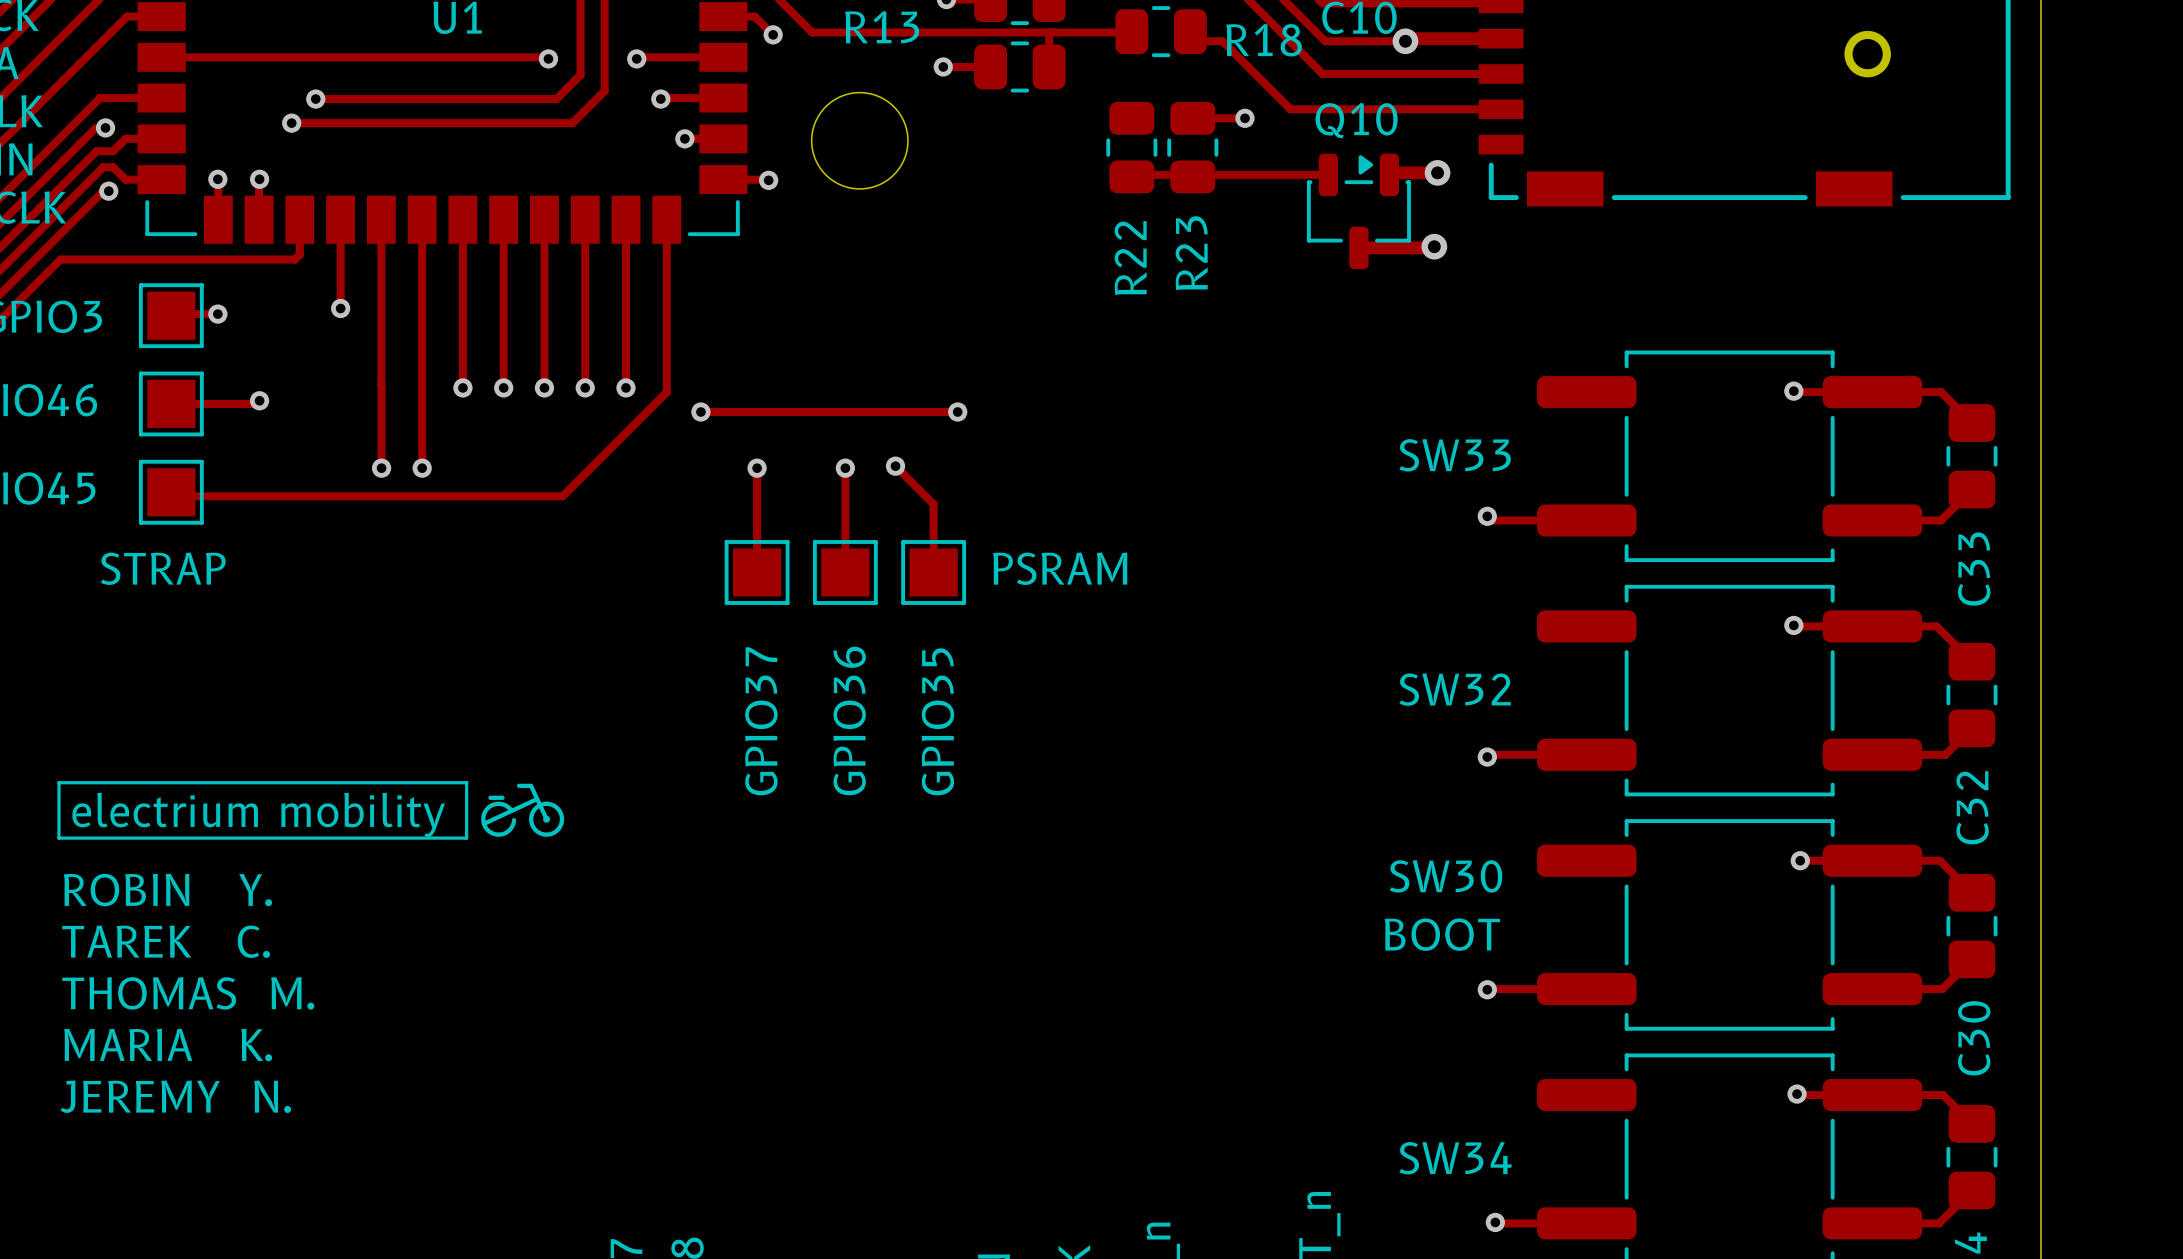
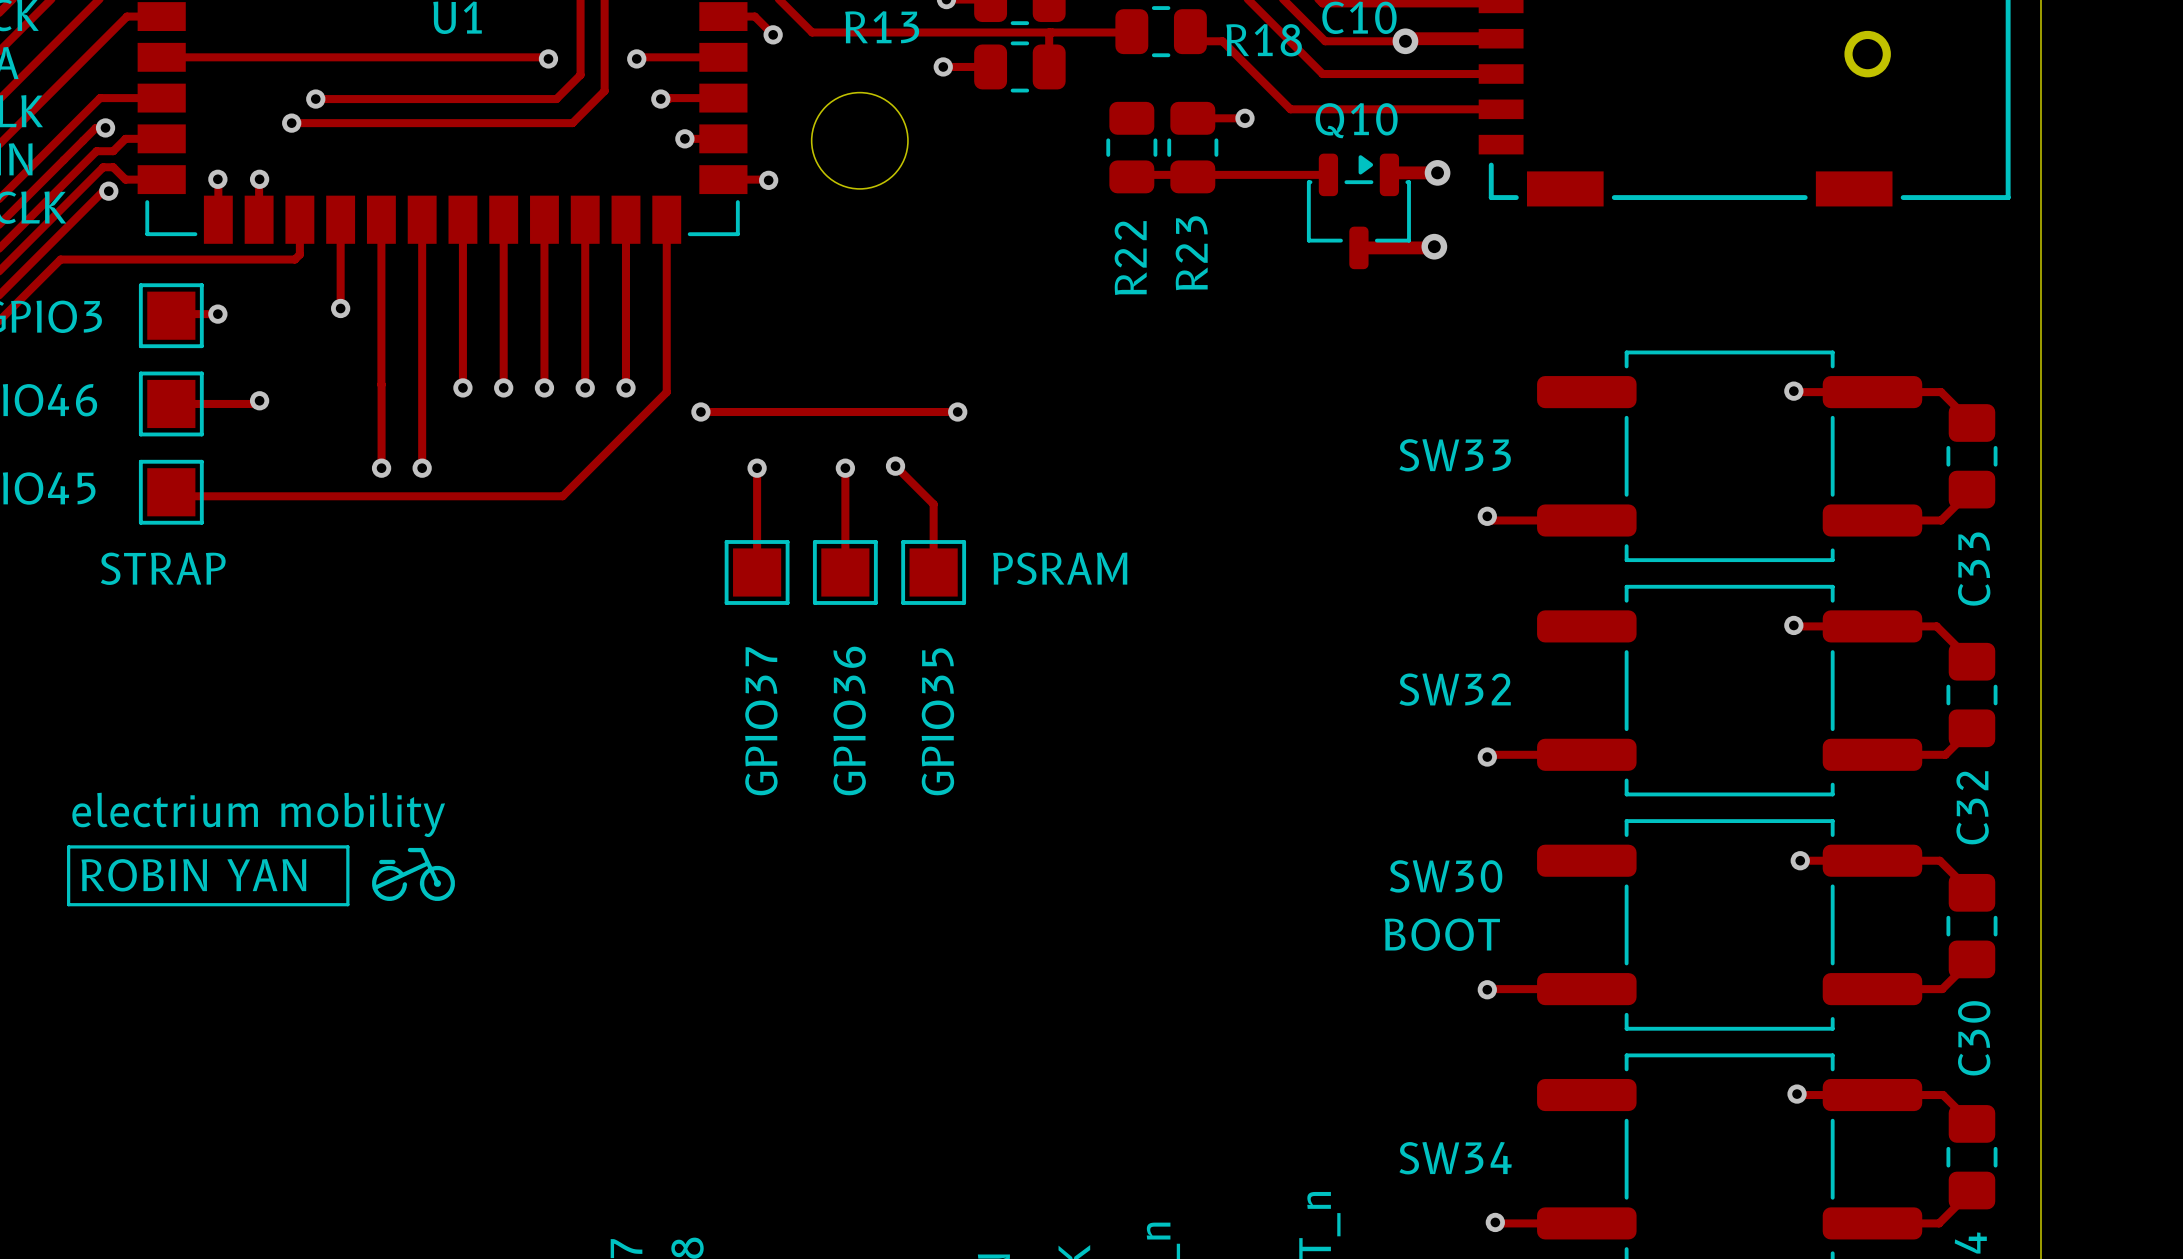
line: (58, 782) (466, 782) (466, 838) (58, 838) (58, 782) -> none
drawing position: (522, 810) -> (413, 874)
line: none -> (68, 846) (347, 846) (347, 904) (68, 904) (68, 846)
text: ROBIN Y. (167, 890) -> ROBIN YAN (193, 875)
text: TAREK C. (166, 941) -> none
text: THOMAS M. (188, 993) -> none
text: MARIA K. (168, 1045) -> none
text: JEREMY N. (175, 1096) -> none

